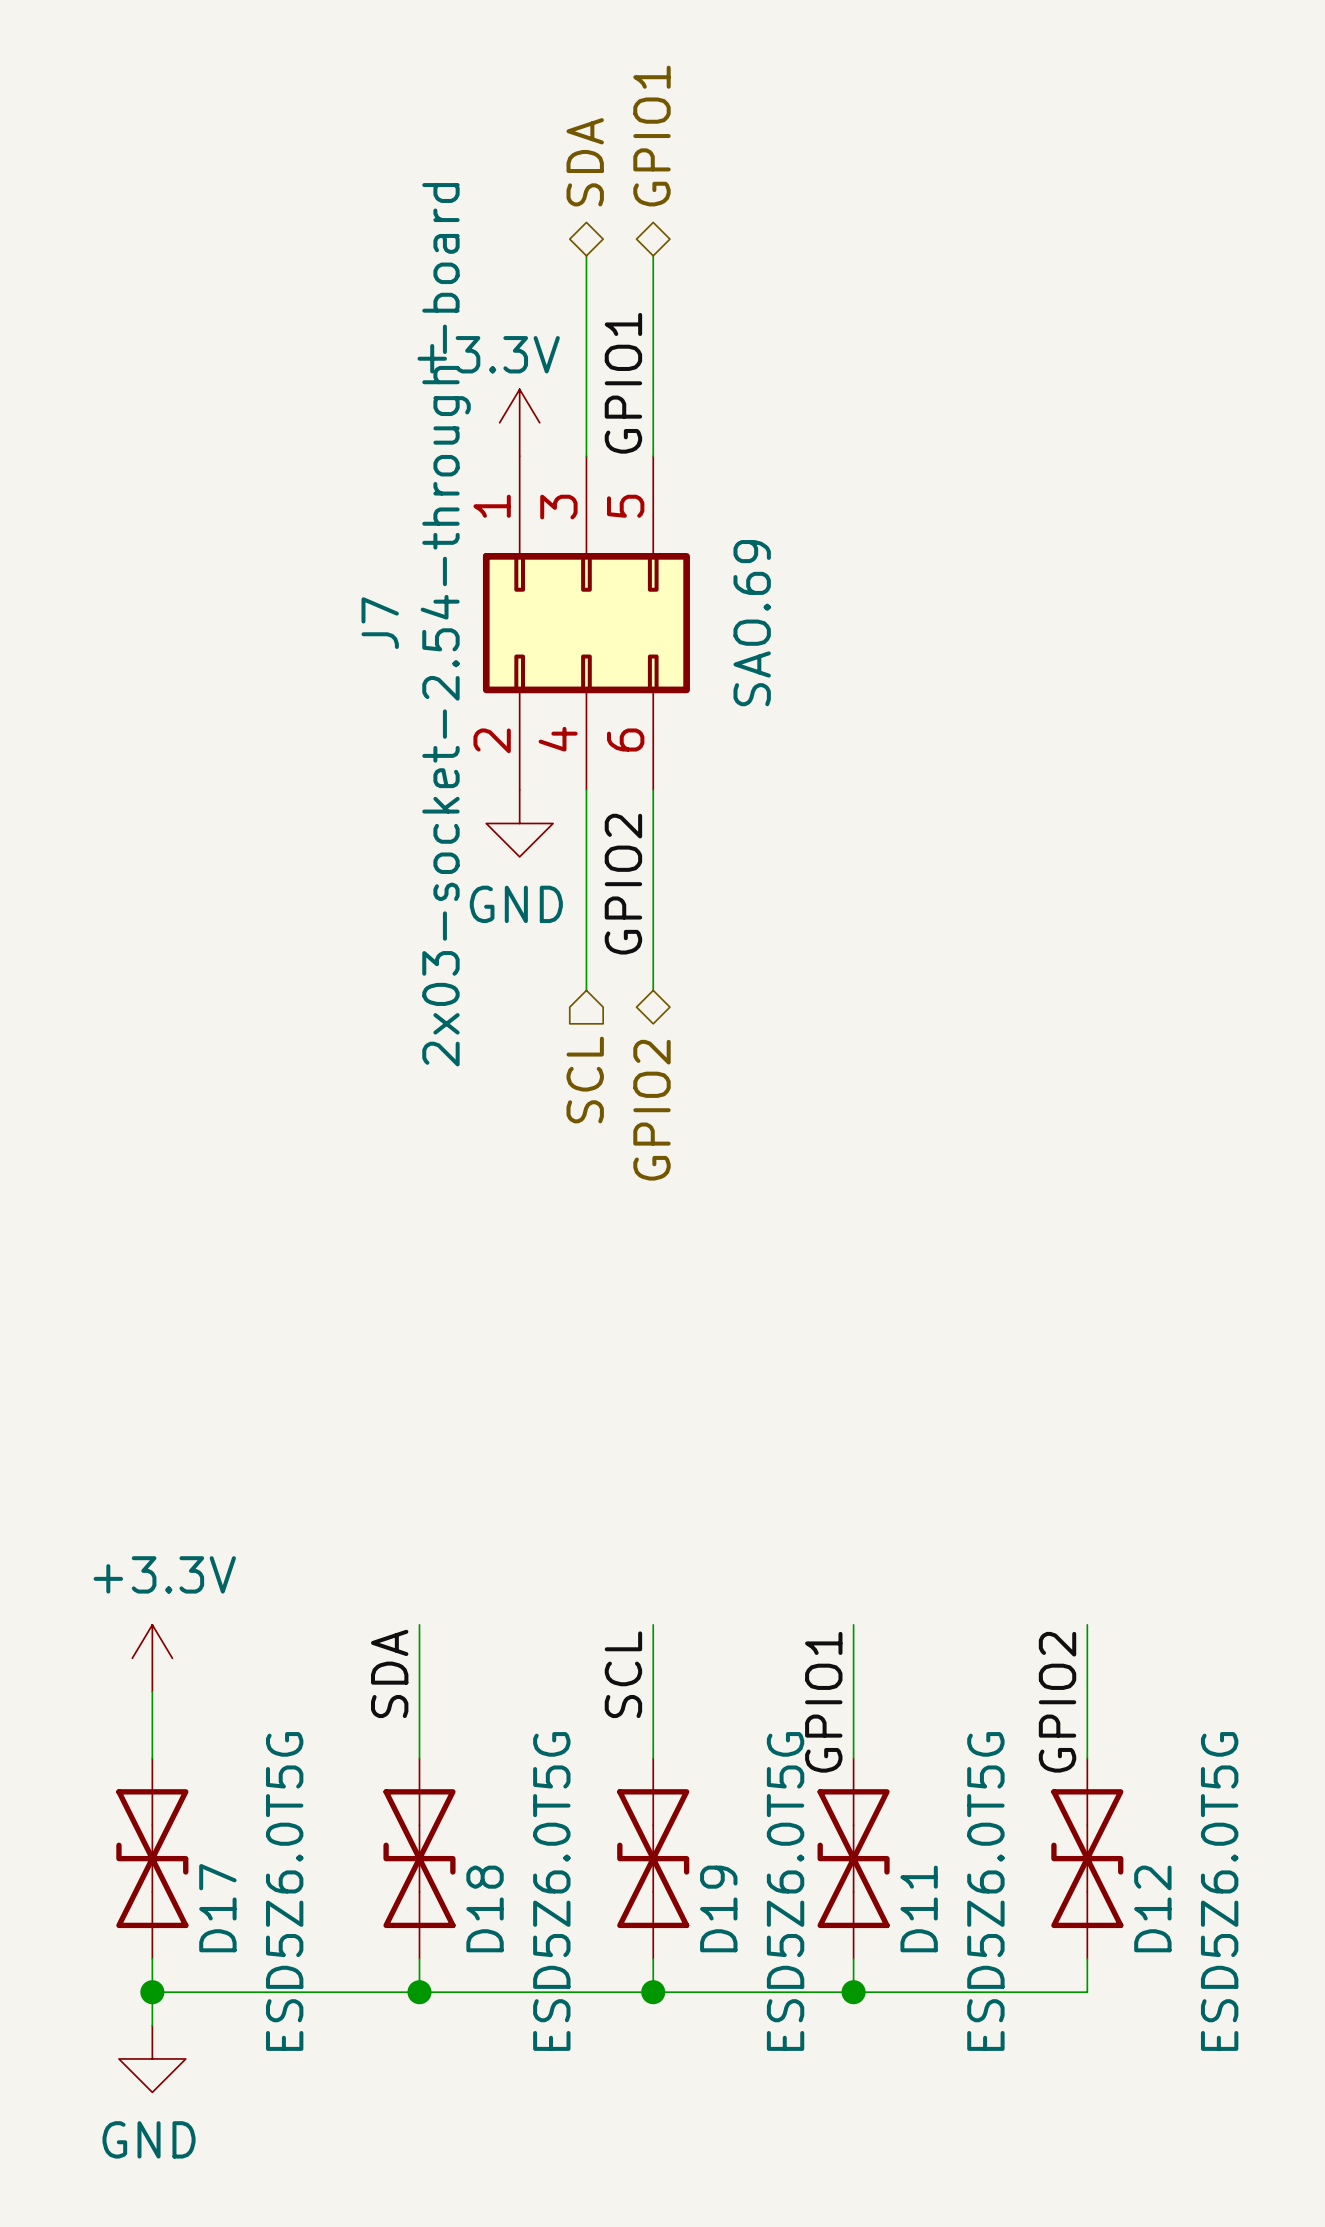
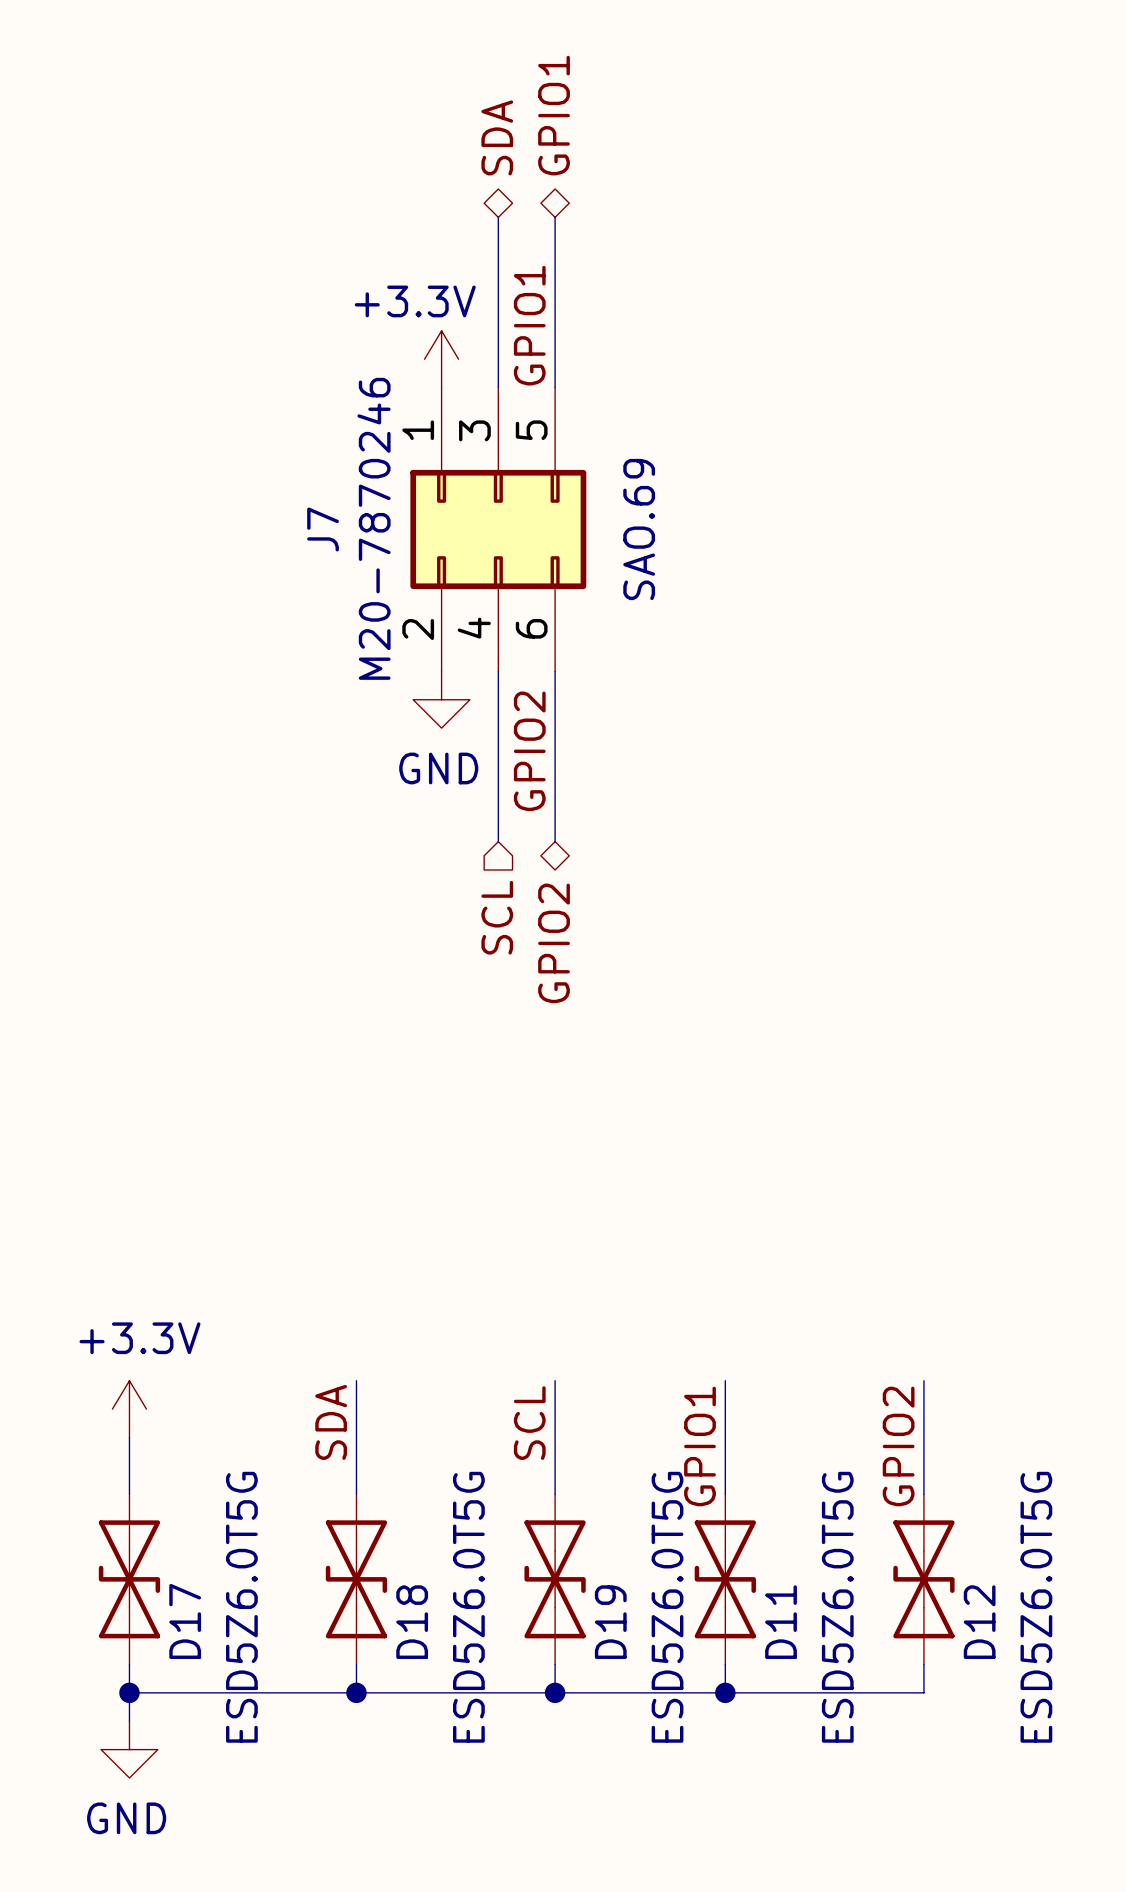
J7 value: 2x03-socket-2.54-through-board (445, 624) -> M20-7870246 (374, 528)

